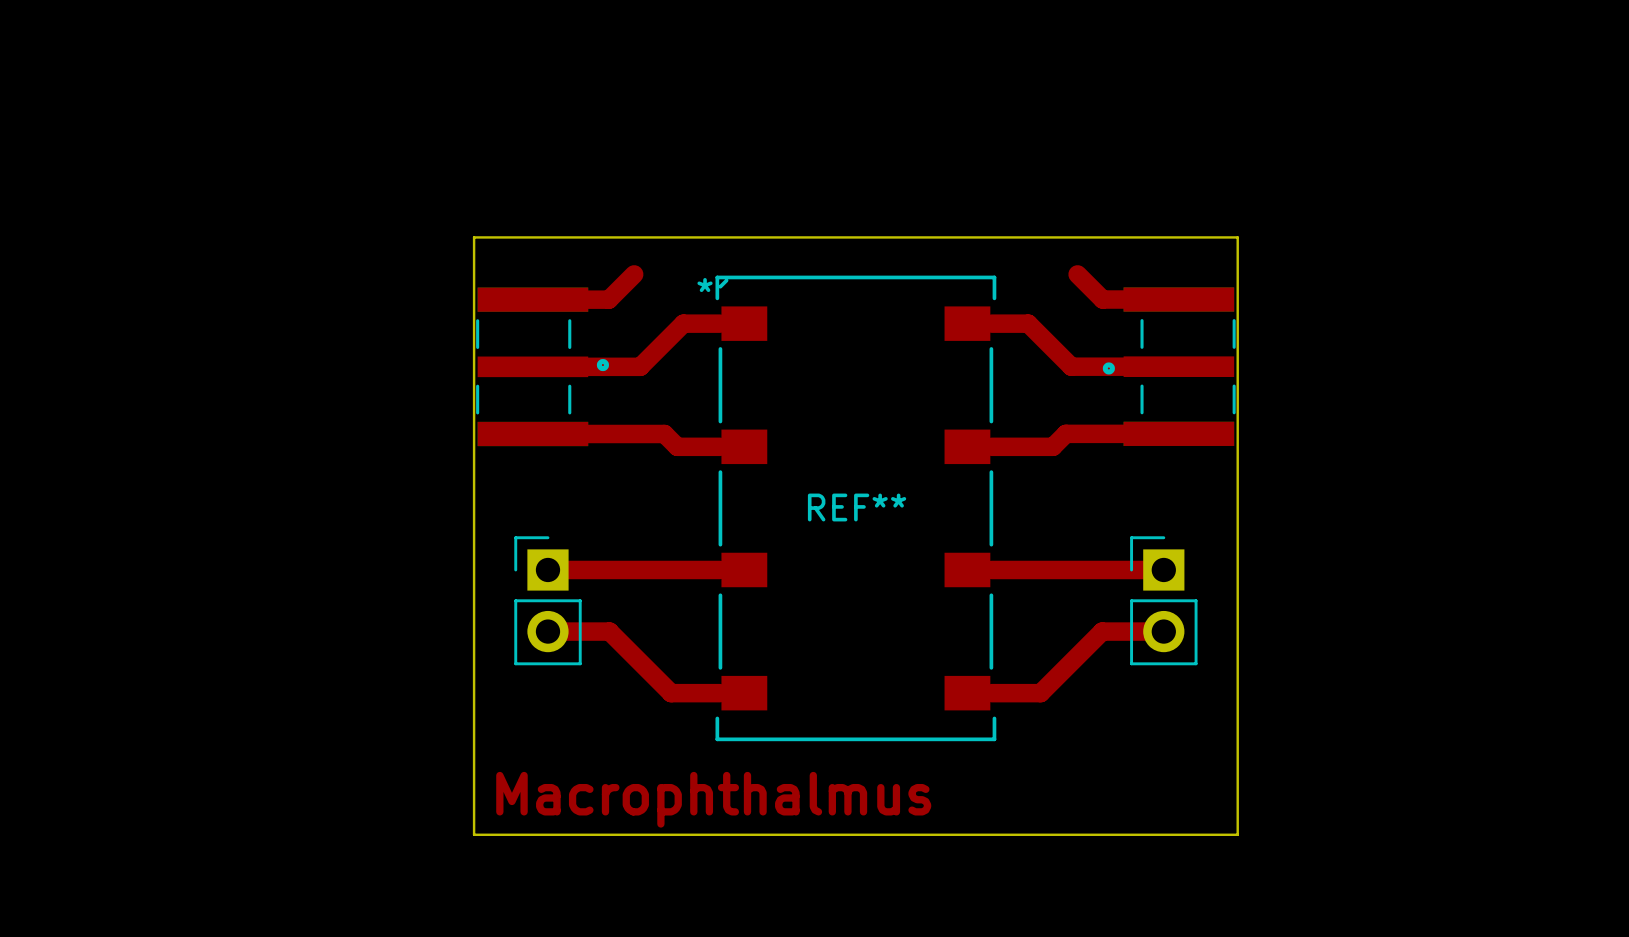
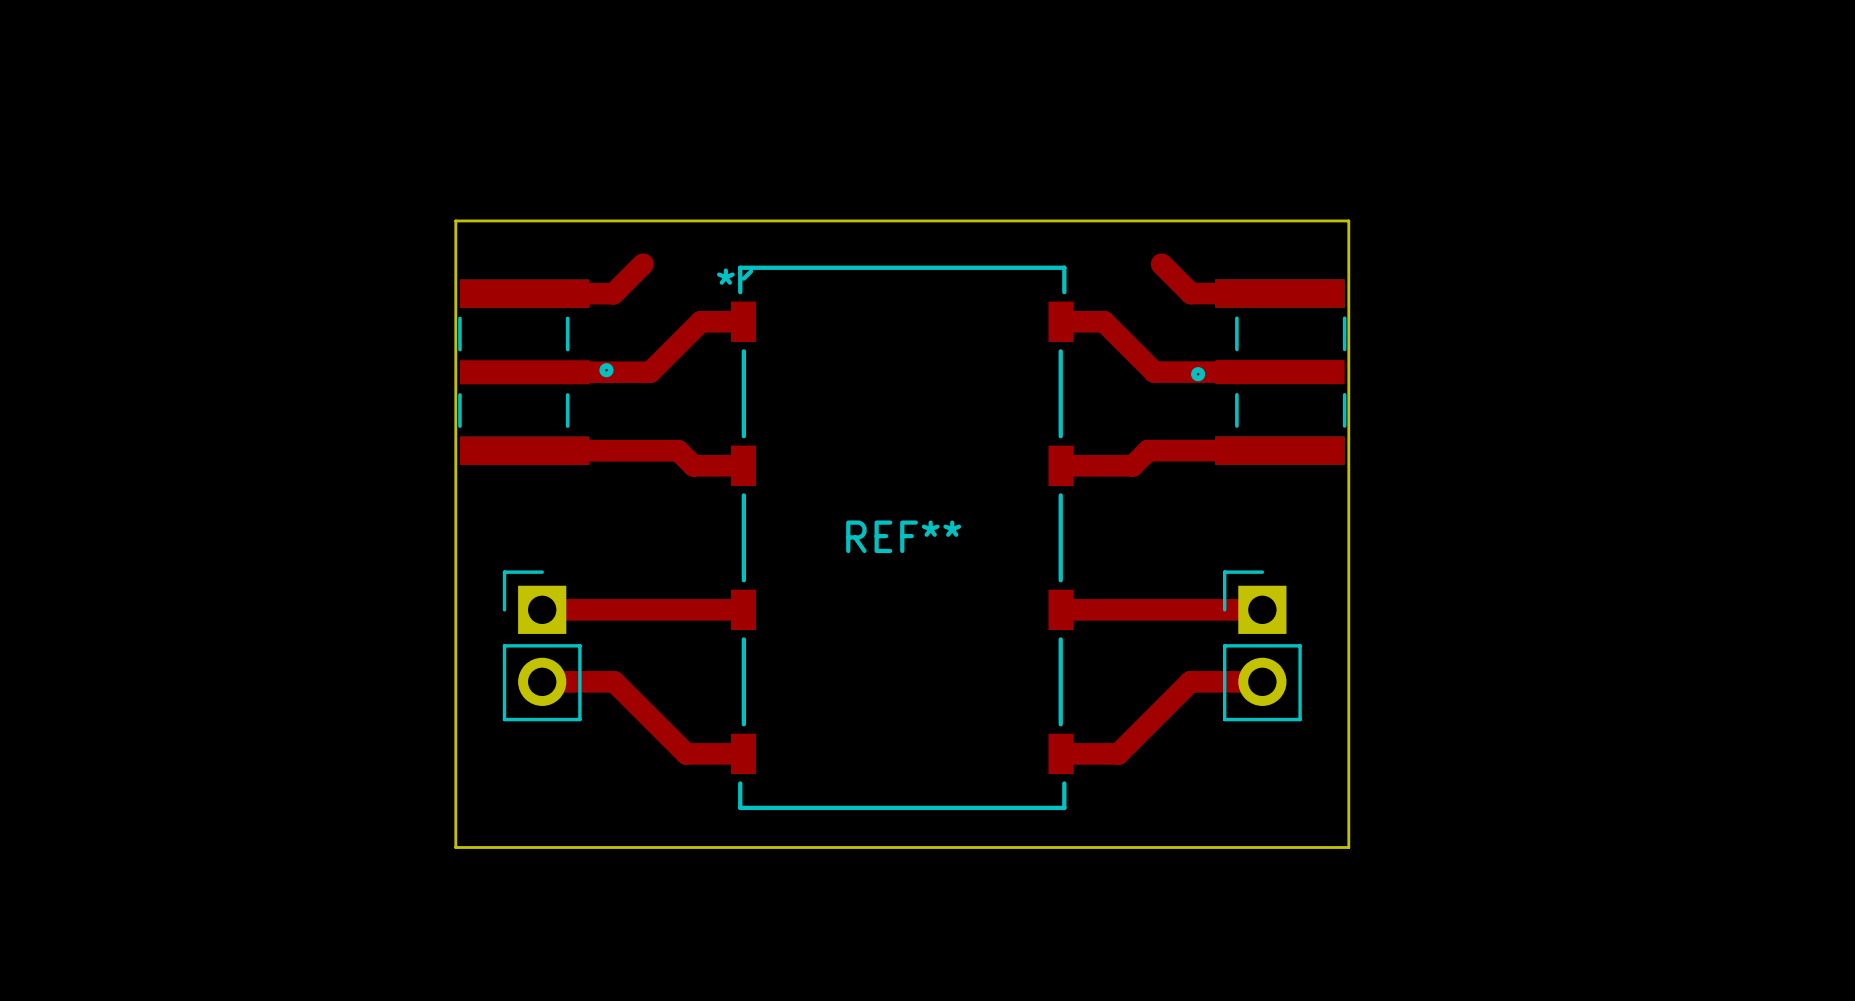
REF** footprint: [715, 275, 997, 742] -> [730, 265, 1074, 811]
board edge: (474, 773) (474, 834) (1237, 834) (1237, 773) -> (455, 847) (1348, 847)
text: Macrophthalmus (713, 799) -> none

